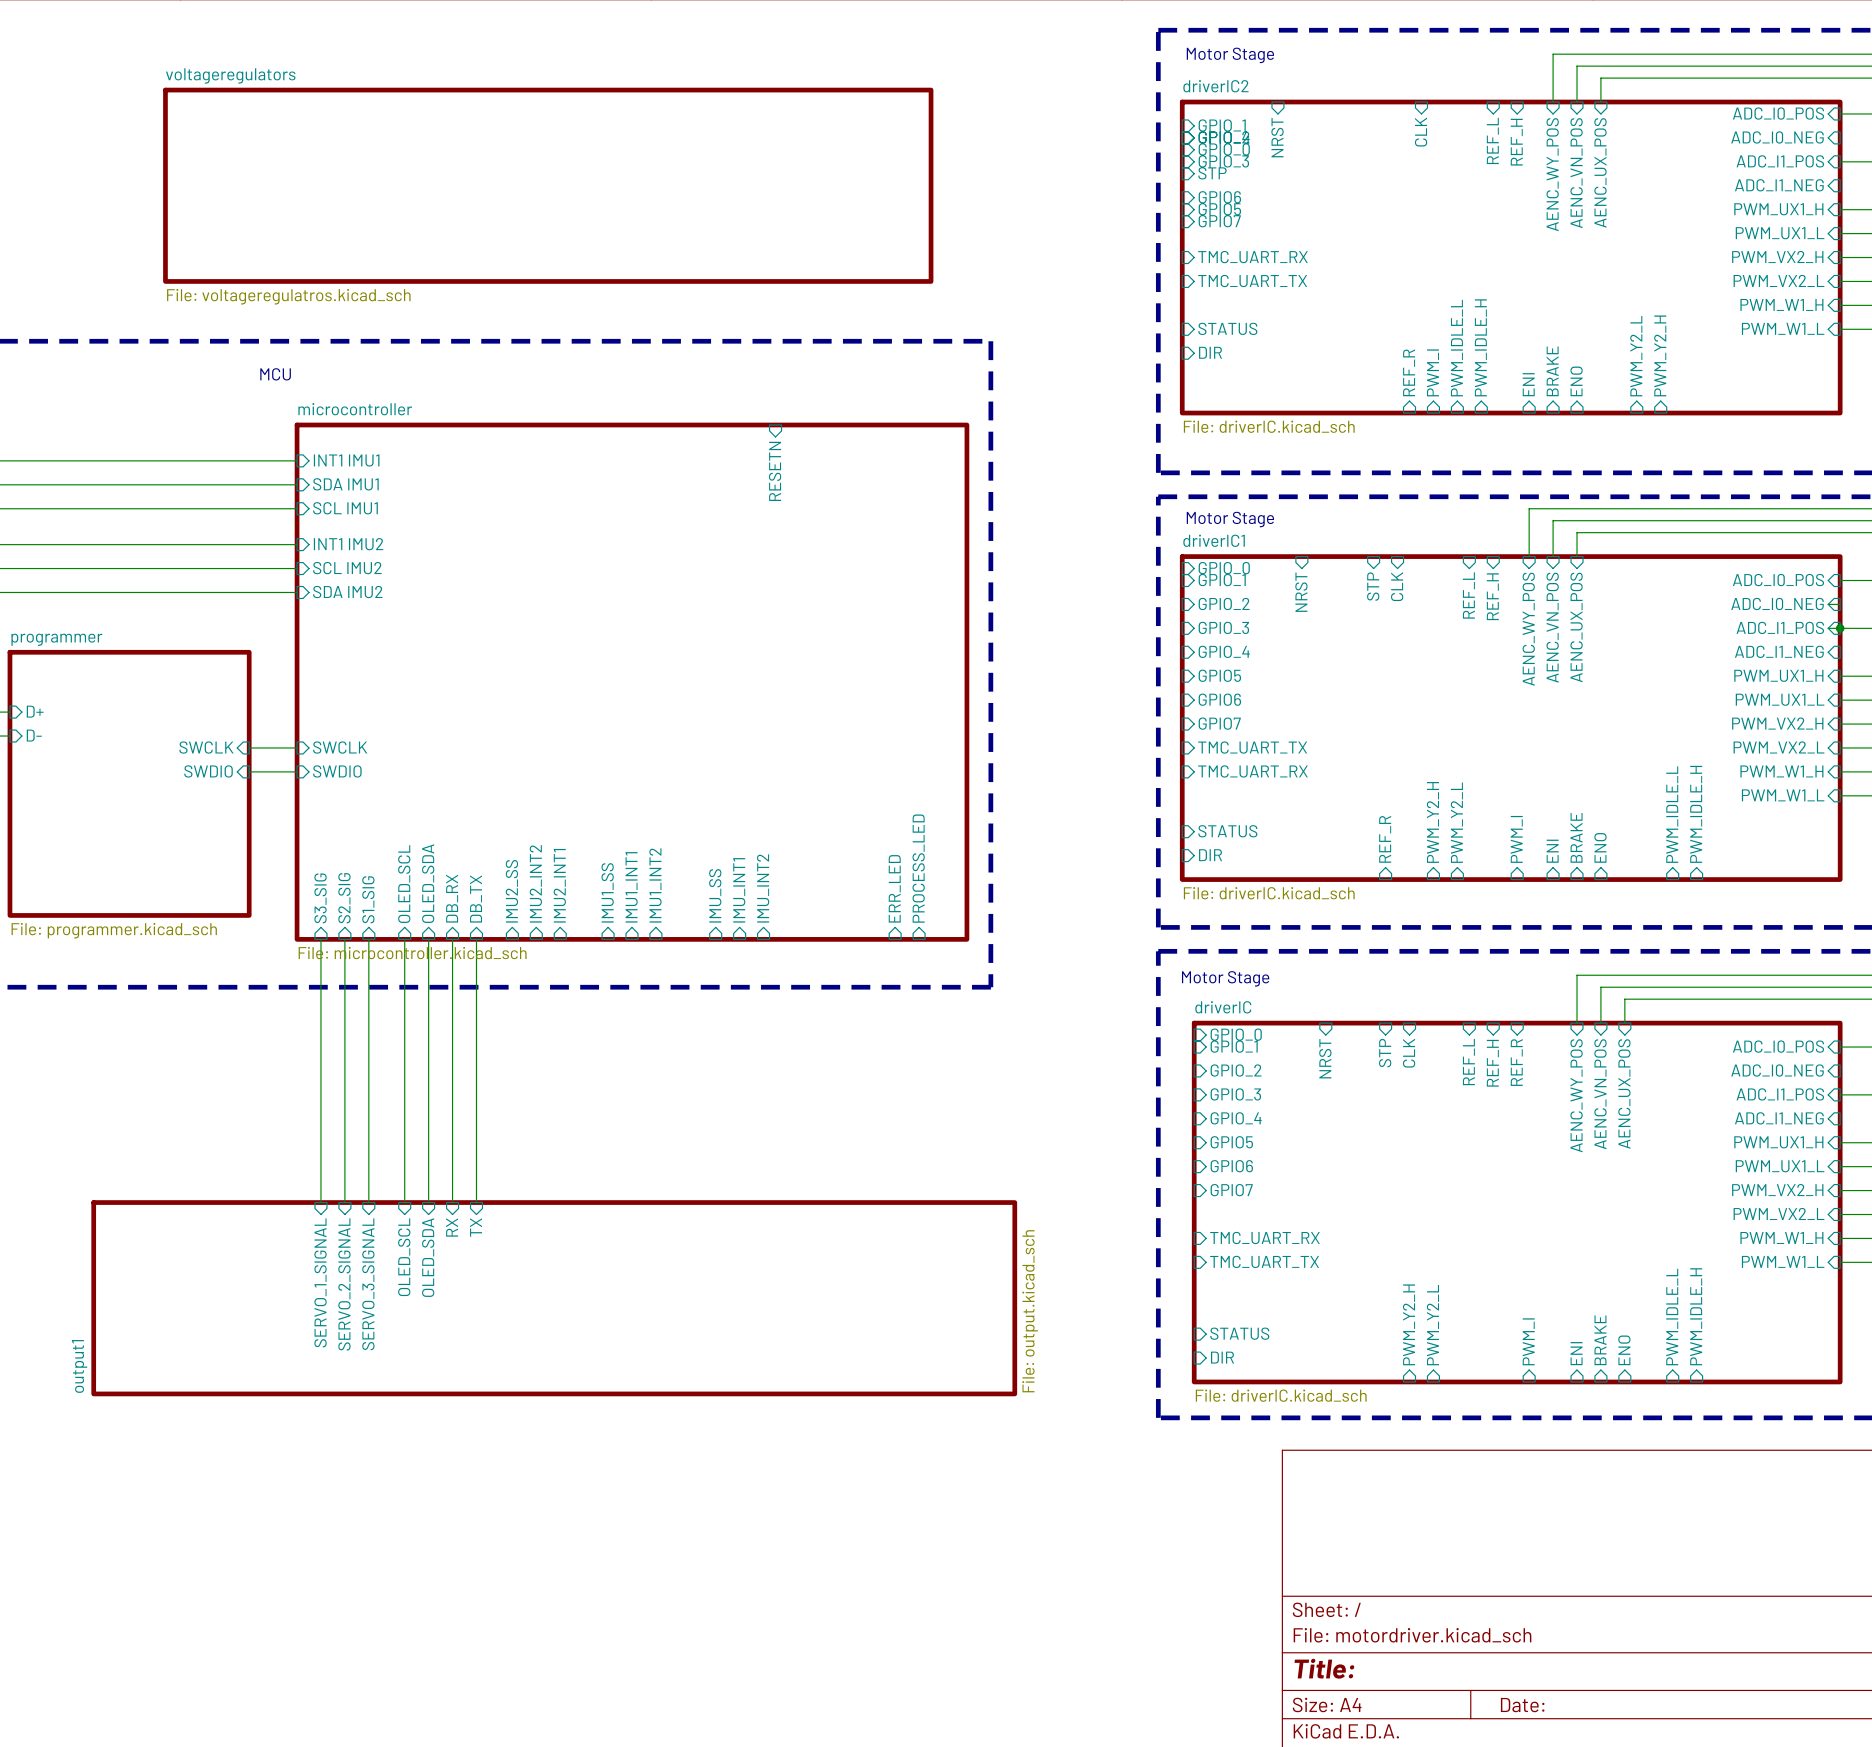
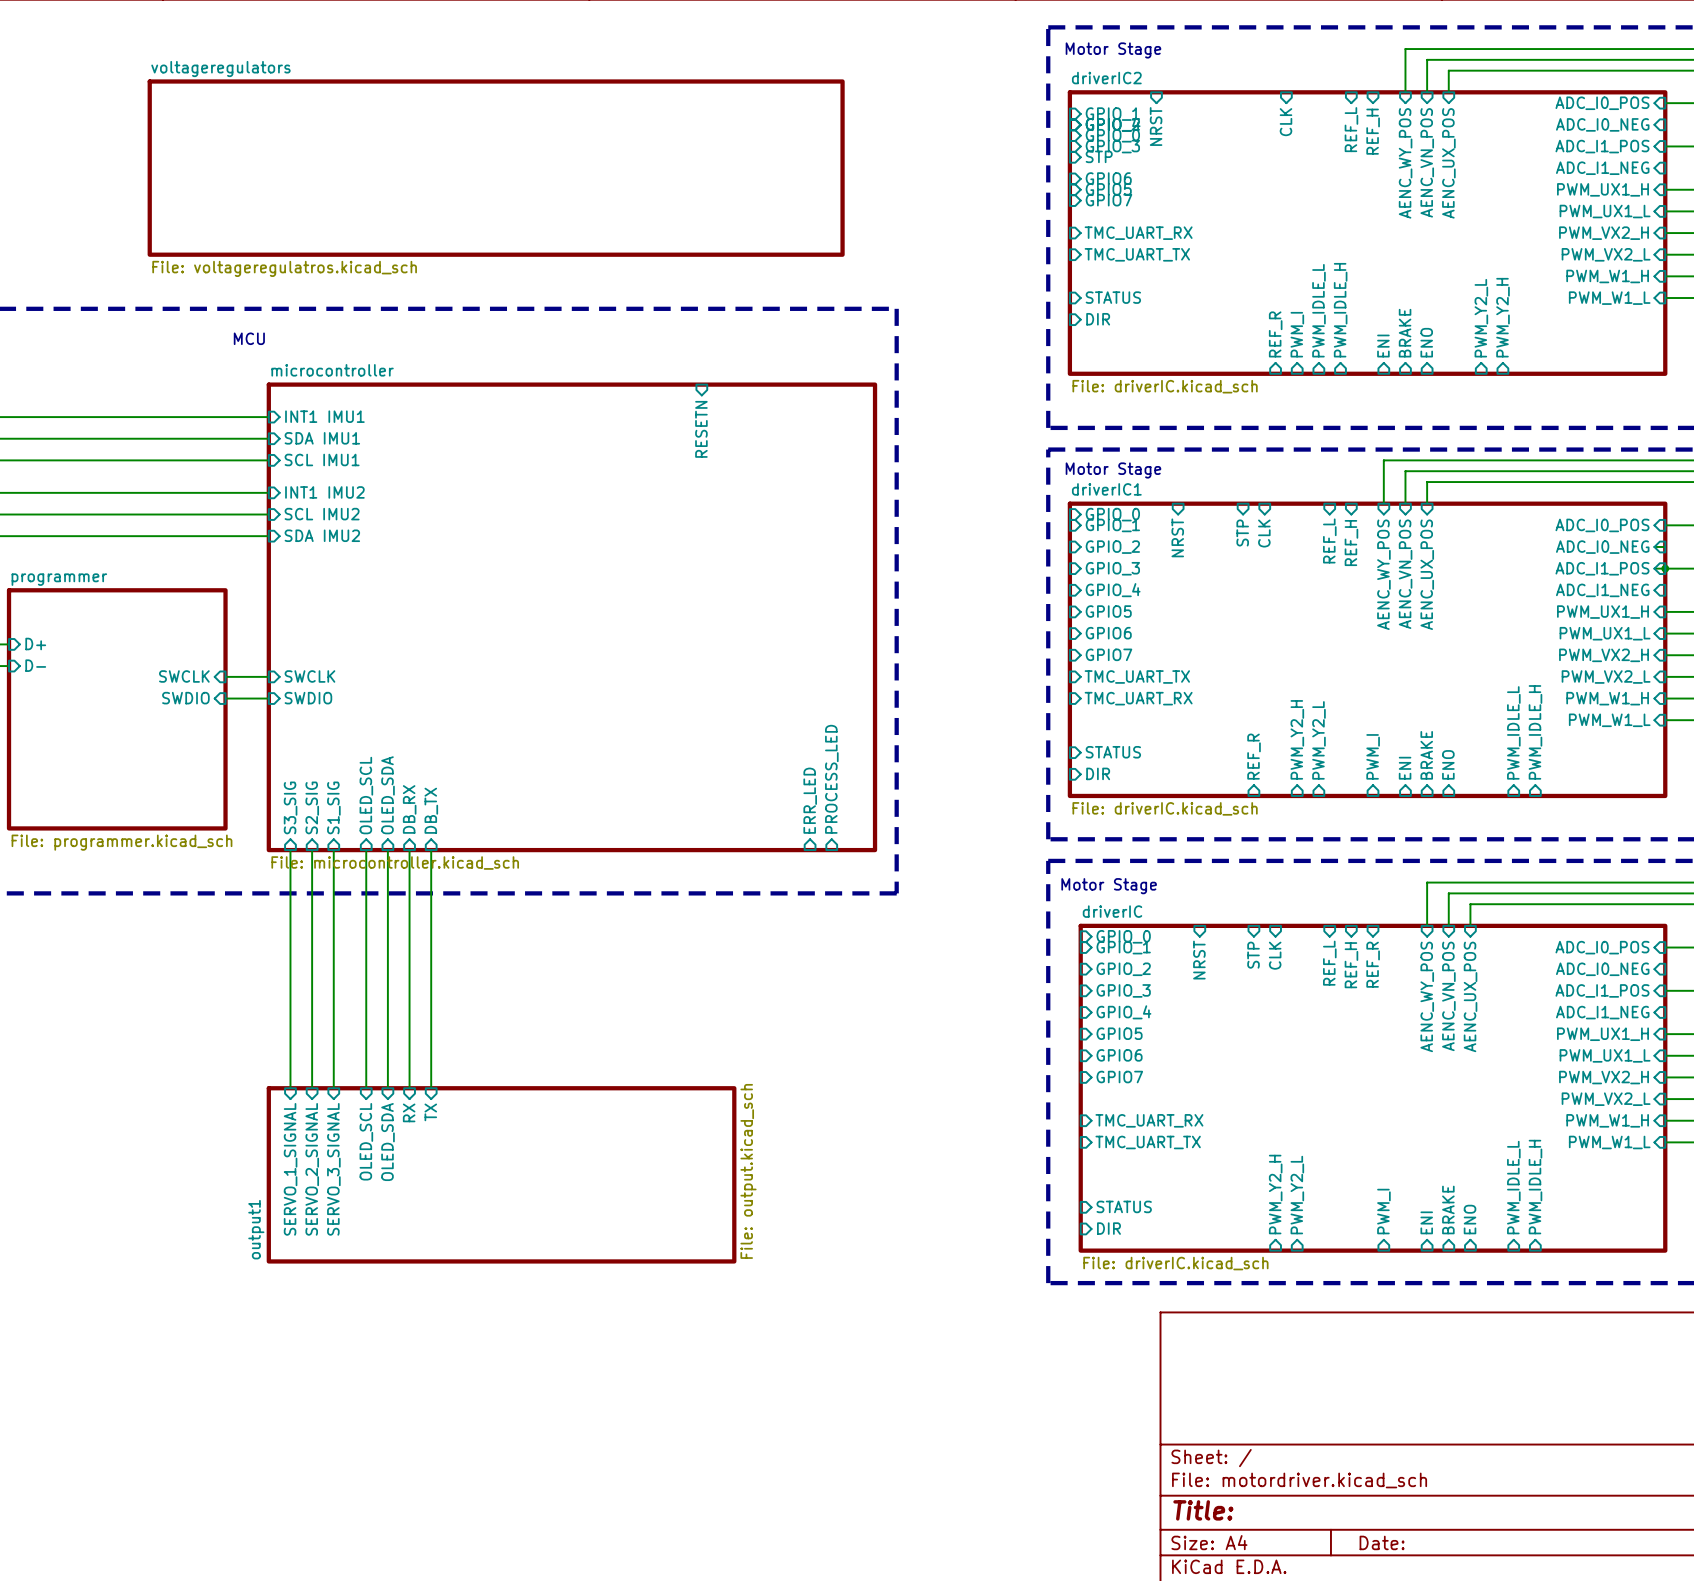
sheet pin: IMU2_INT2 (535, 883) -> none
sheet pin: IMU2_INT1 (559, 885) -> none
sheet pin: IMU1_INT2 (655, 885) -> none
sheet pin: IMU1_INT1 (631, 887) -> none
sheet pin: IMU_INT2 (763, 888) -> none
sheet pin: IMU_INT1 (739, 890) -> none
sheet pin: IMU2_SS (511, 891) -> none
sheet pin: IMU1_SS (607, 892) -> none
sheet pin: IMU_SS (715, 895) -> none
sheet output1 shape: [91, 1200, 1018, 1397] -> [266, 1086, 737, 1264]
sheet output1 value position: File: output.kicad_sch (1030, 1311) -> File: output.kicad_sch (748, 1171)
sheet output1 name position: output1 (79, 1366) -> output1 (256, 1229)

